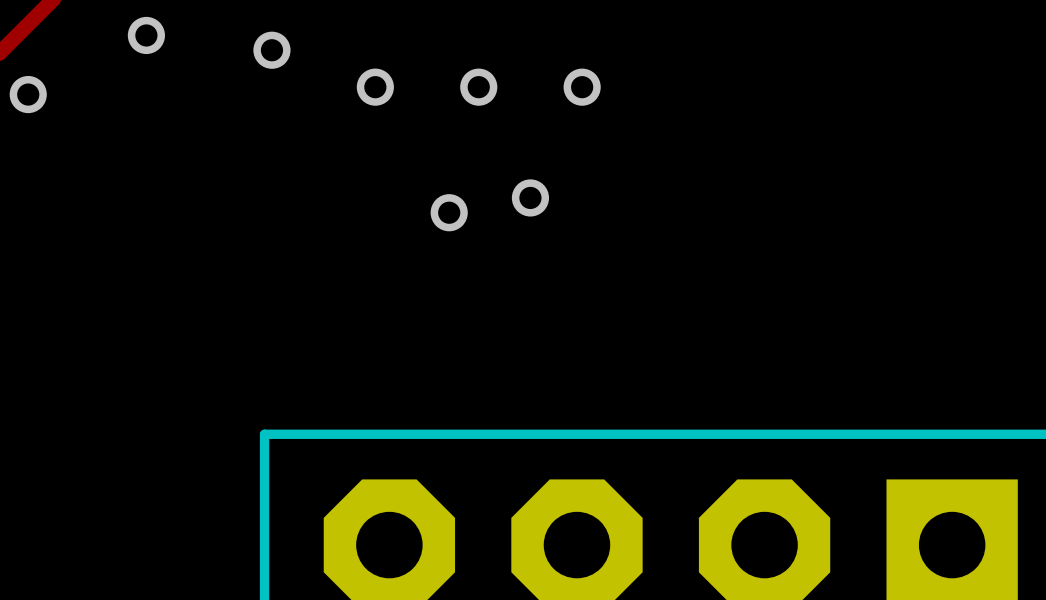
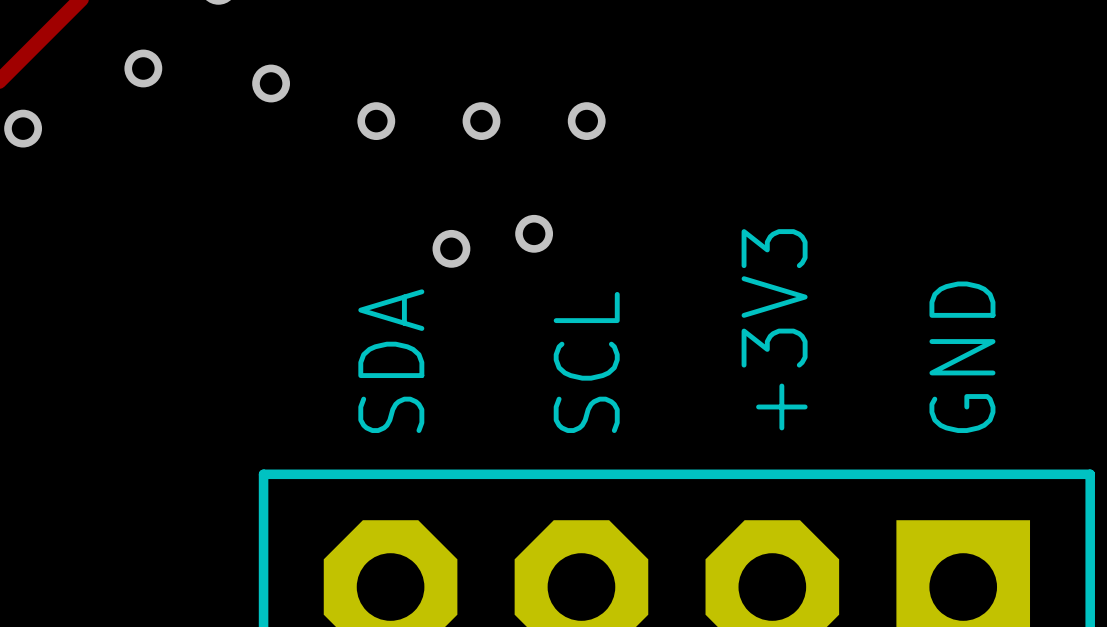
text: none -> +3V3 (774, 329)
text: none -> GND (962, 357)
text: none -> SDA (391, 361)
text: none -> SCL (586, 362)

